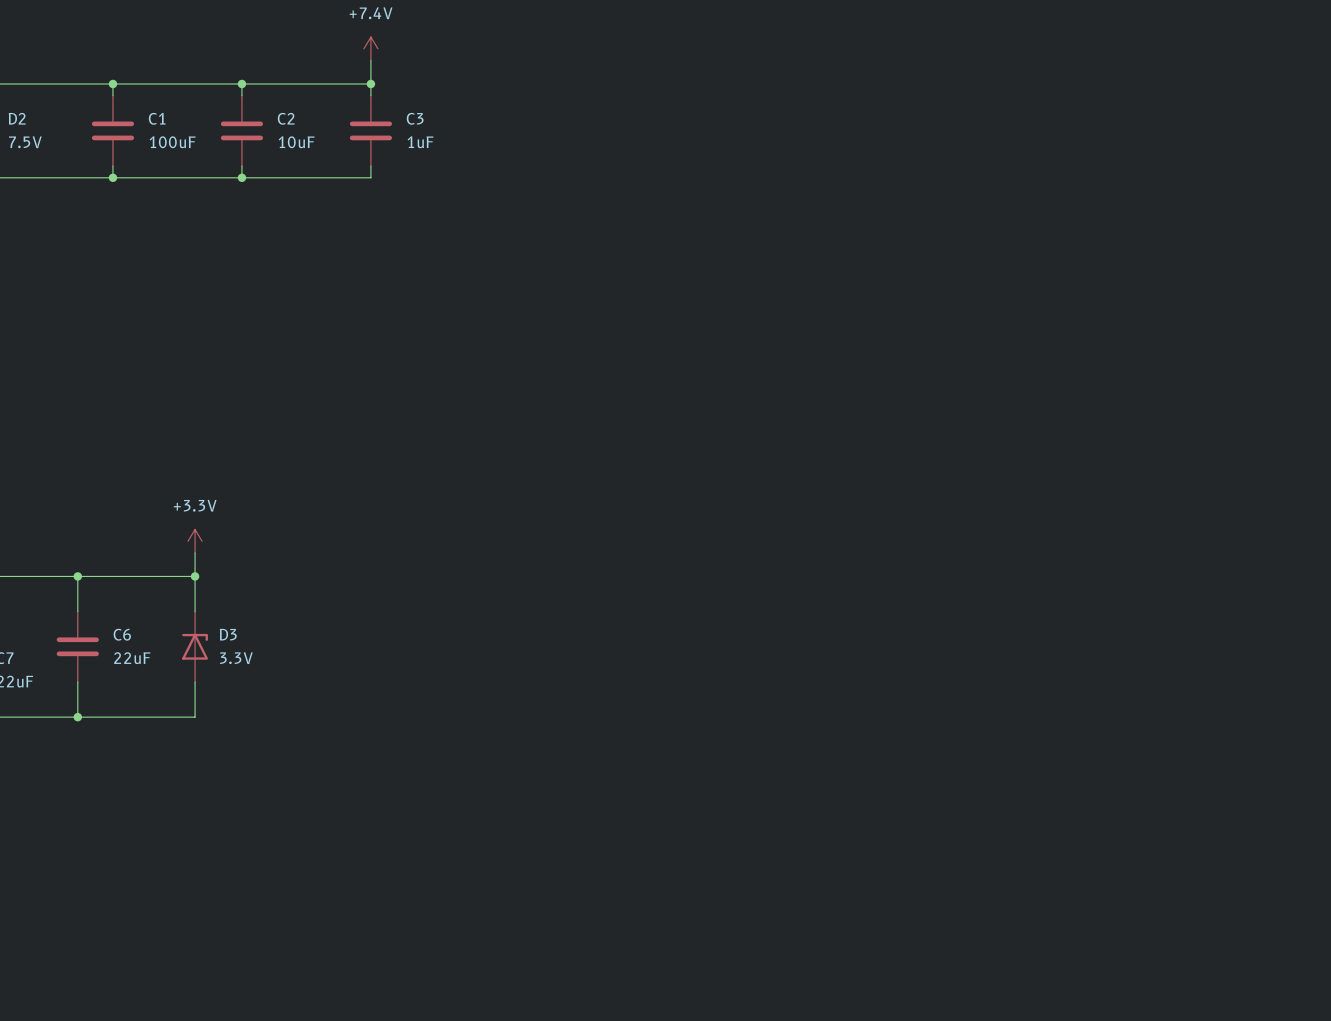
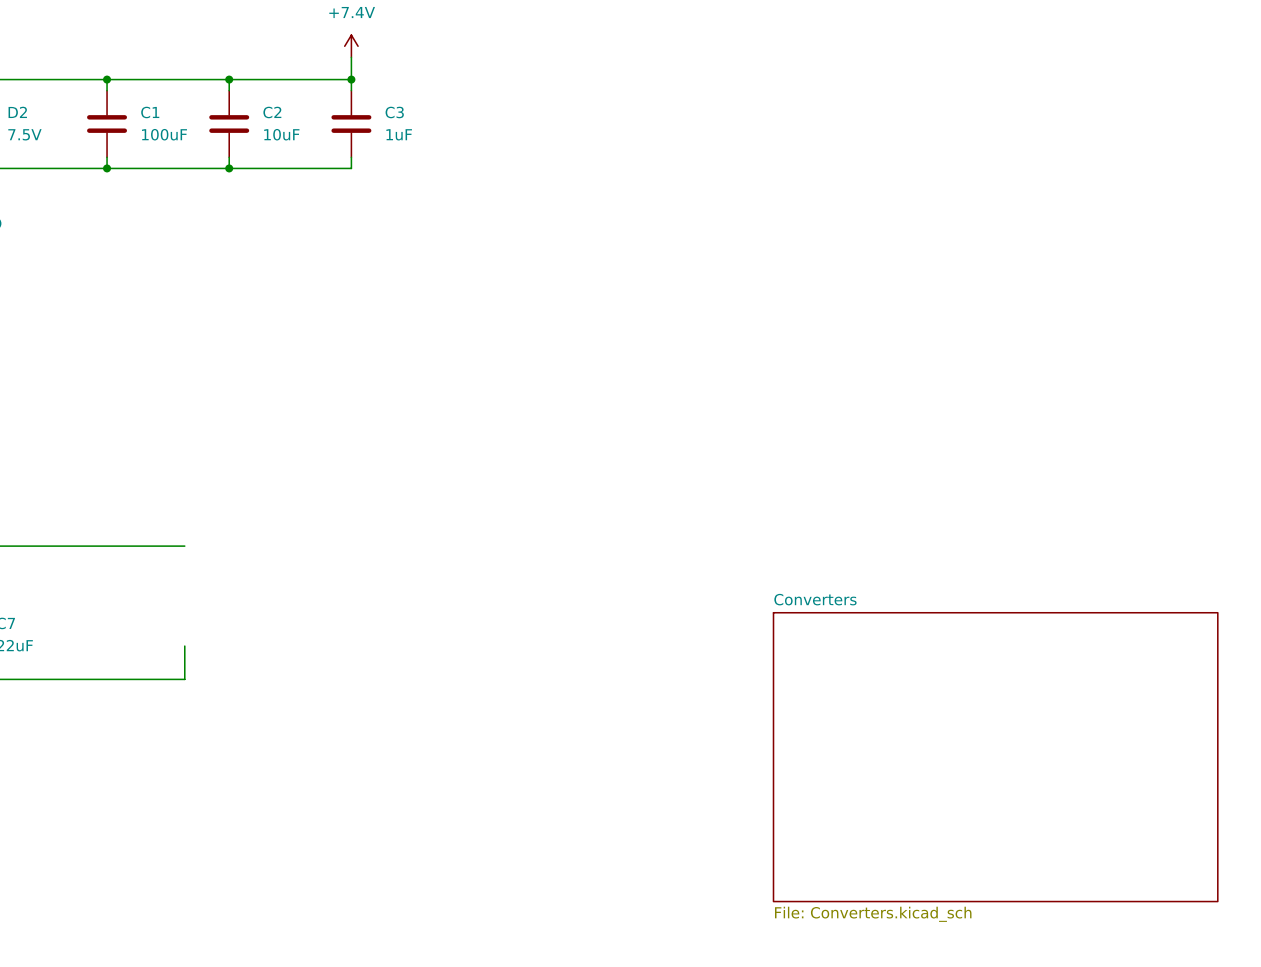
power symbol: +3.3V (195, 541) -> none
wire: (195, 552) (195, 611) -> none
wire: (77, 576) (77, 611) -> none
junction: (77, 576) -> none
junction: (195, 576) -> none
C6: 22uF (77, 646) -> none
D3: 3.3V (195, 646) -> none
wire: (77, 681) (77, 717) -> none
junction: (77, 717) -> none
sheet Converters: none -> File: Converters.kicad_sch (995, 757)

